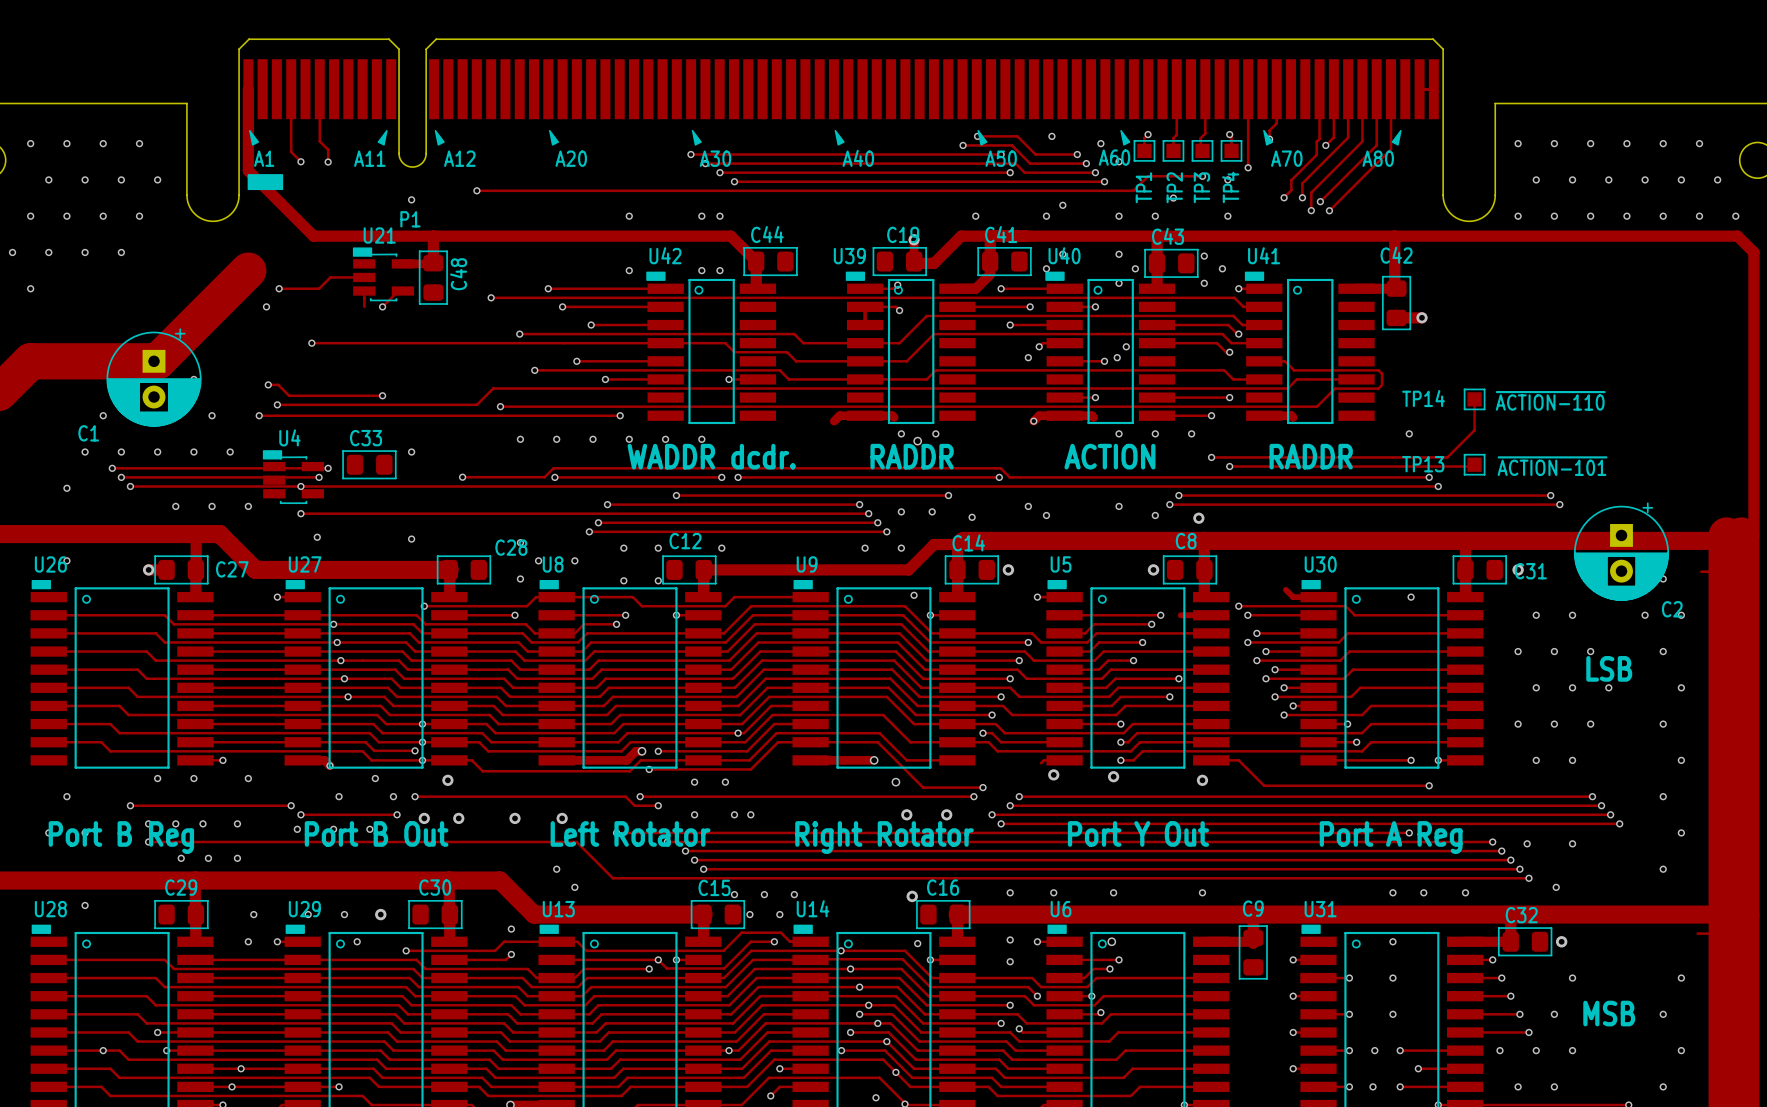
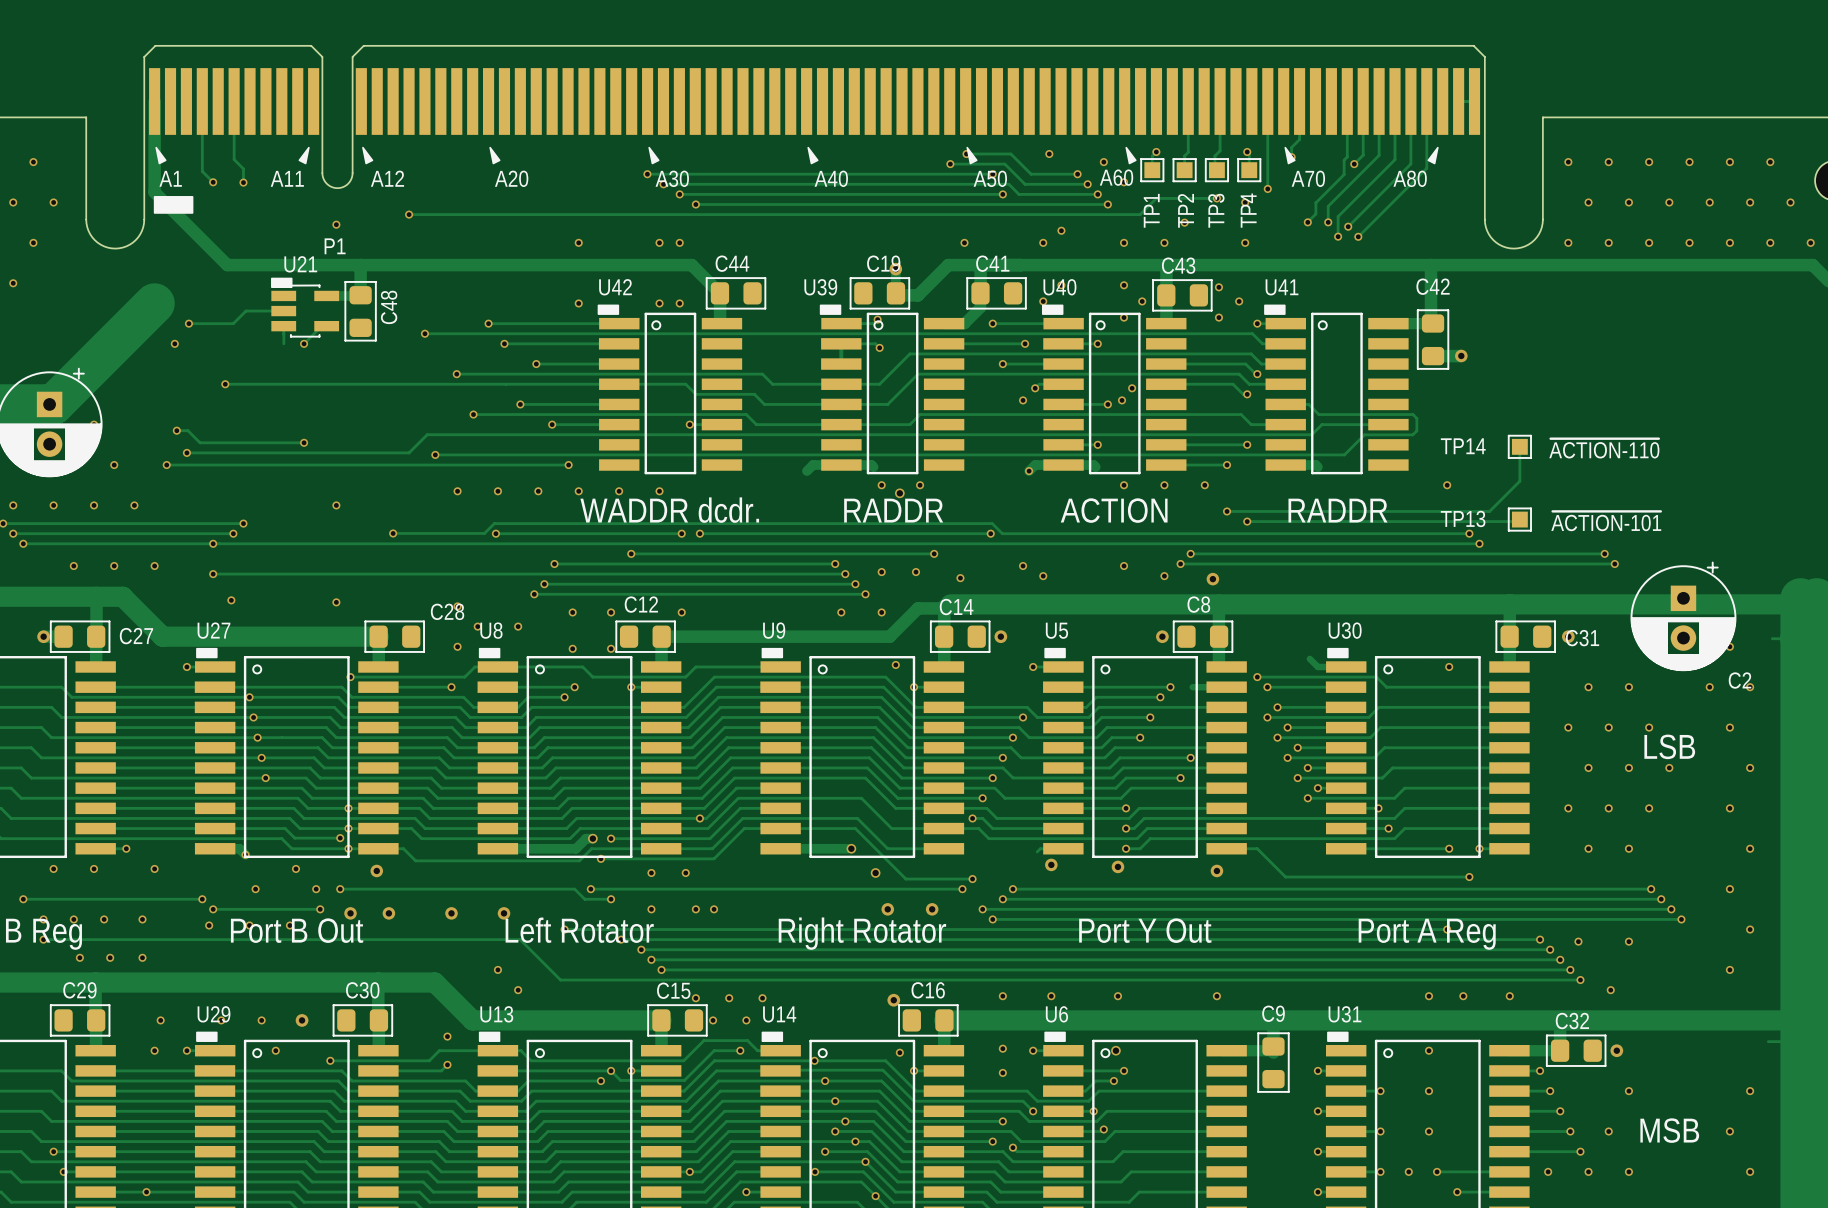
C33: (369, 464) -> none
U4: (293, 477) -> none

